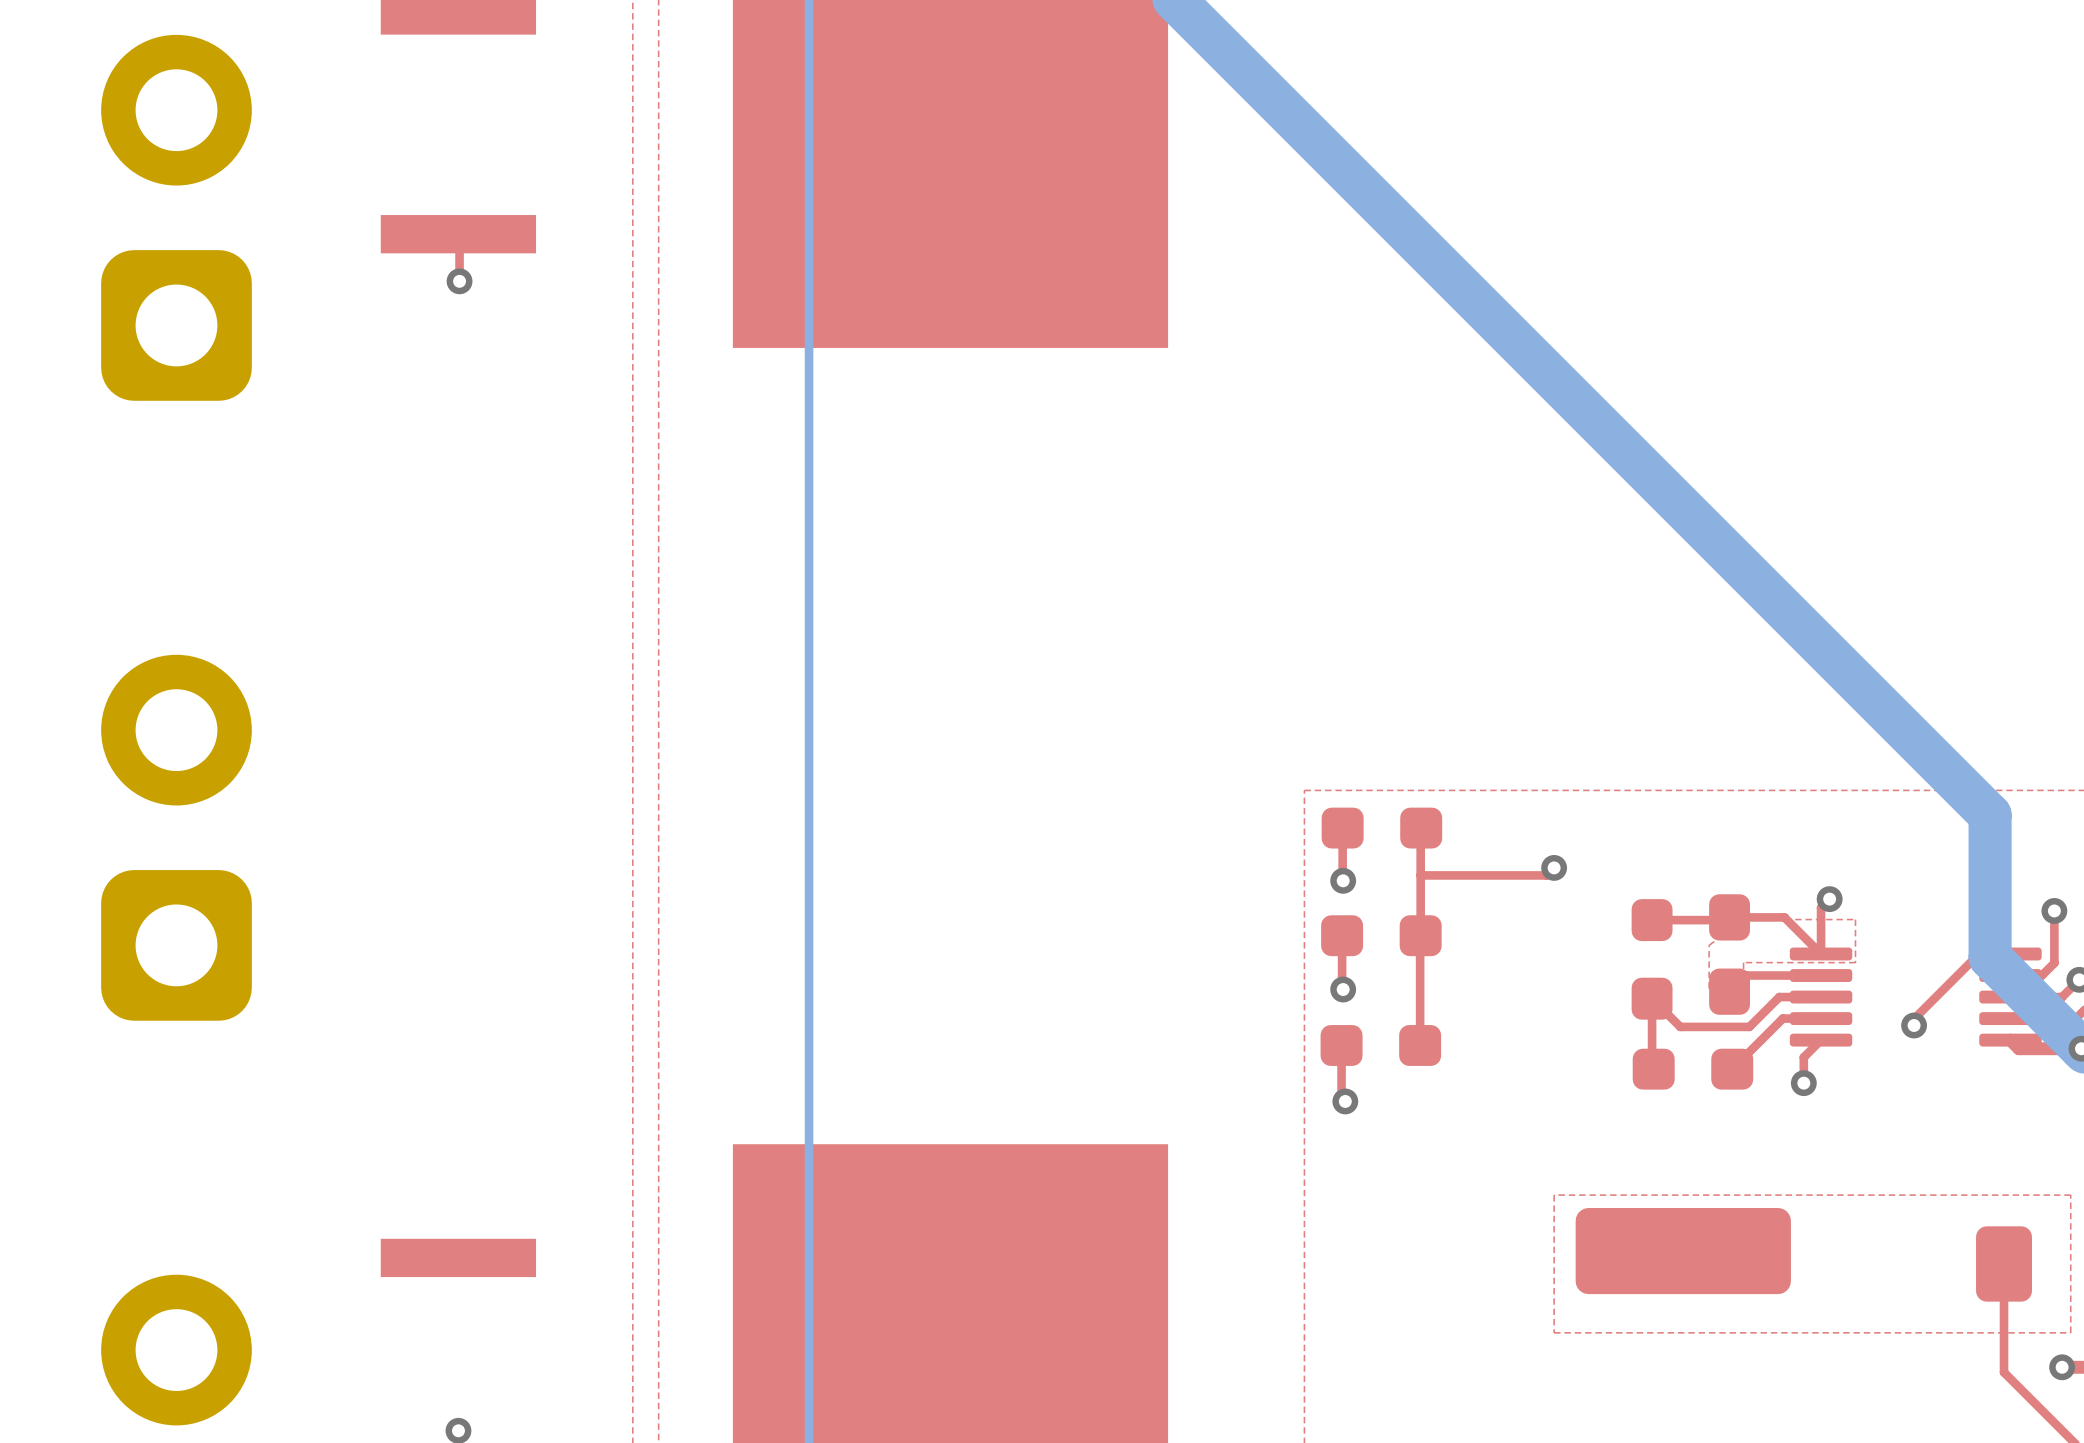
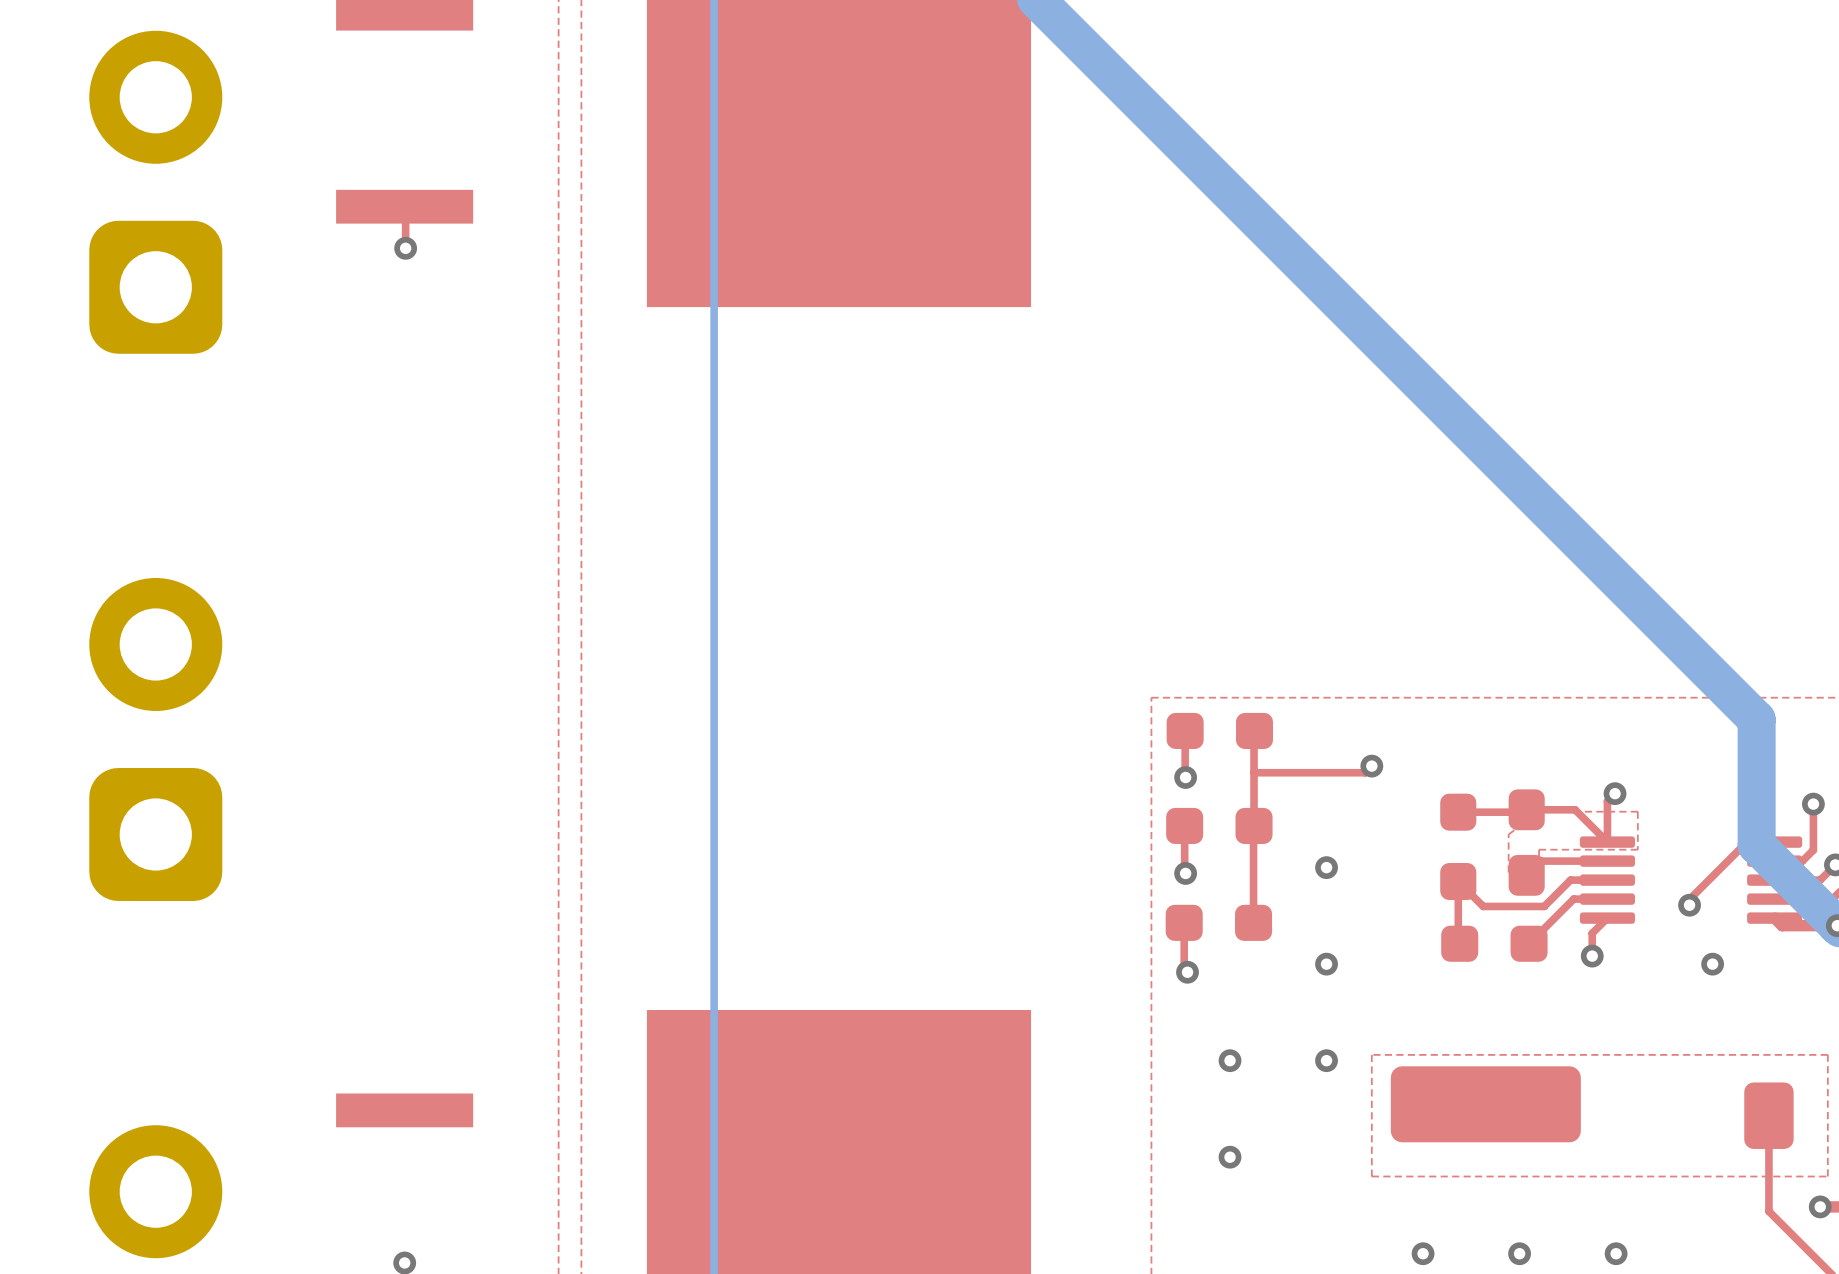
via: none -> (1326, 867)
via: none -> (1326, 964)
via: none -> (1712, 964)
via: none -> (1230, 1060)
via: none -> (1326, 1060)
via: none -> (1230, 1157)
via: none -> (1423, 1253)
via: none -> (1519, 1253)
via: none -> (1616, 1253)

